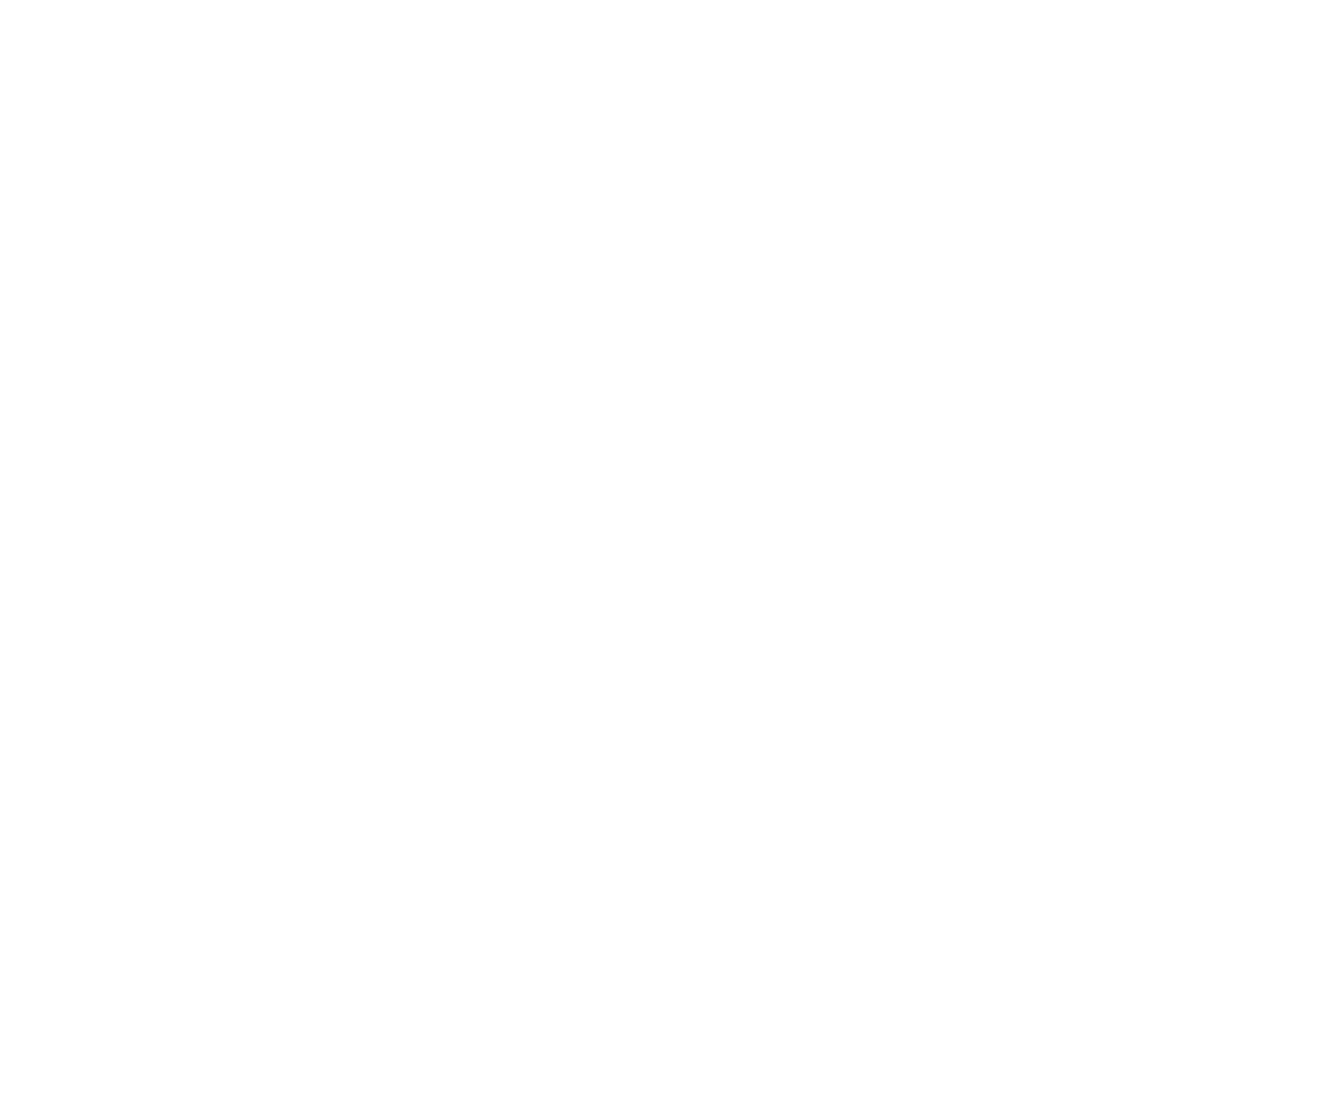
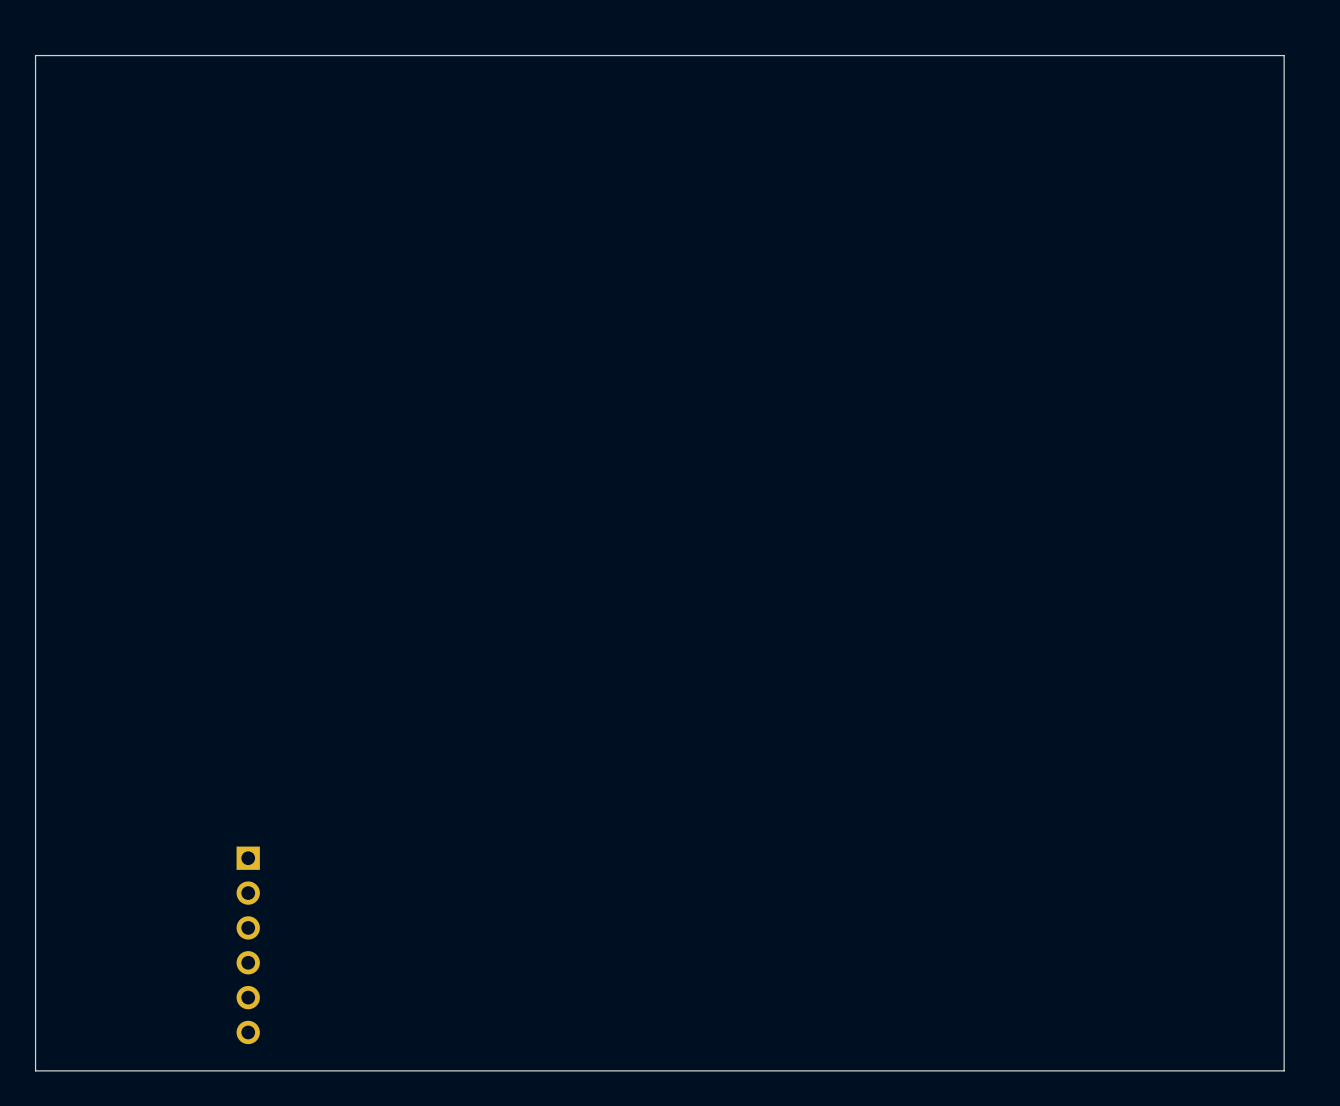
board edge: none -> (1284, 55) (35, 55) (35, 1070) (1284, 1070) (1284, 55)
part: none -> (248, 945)

